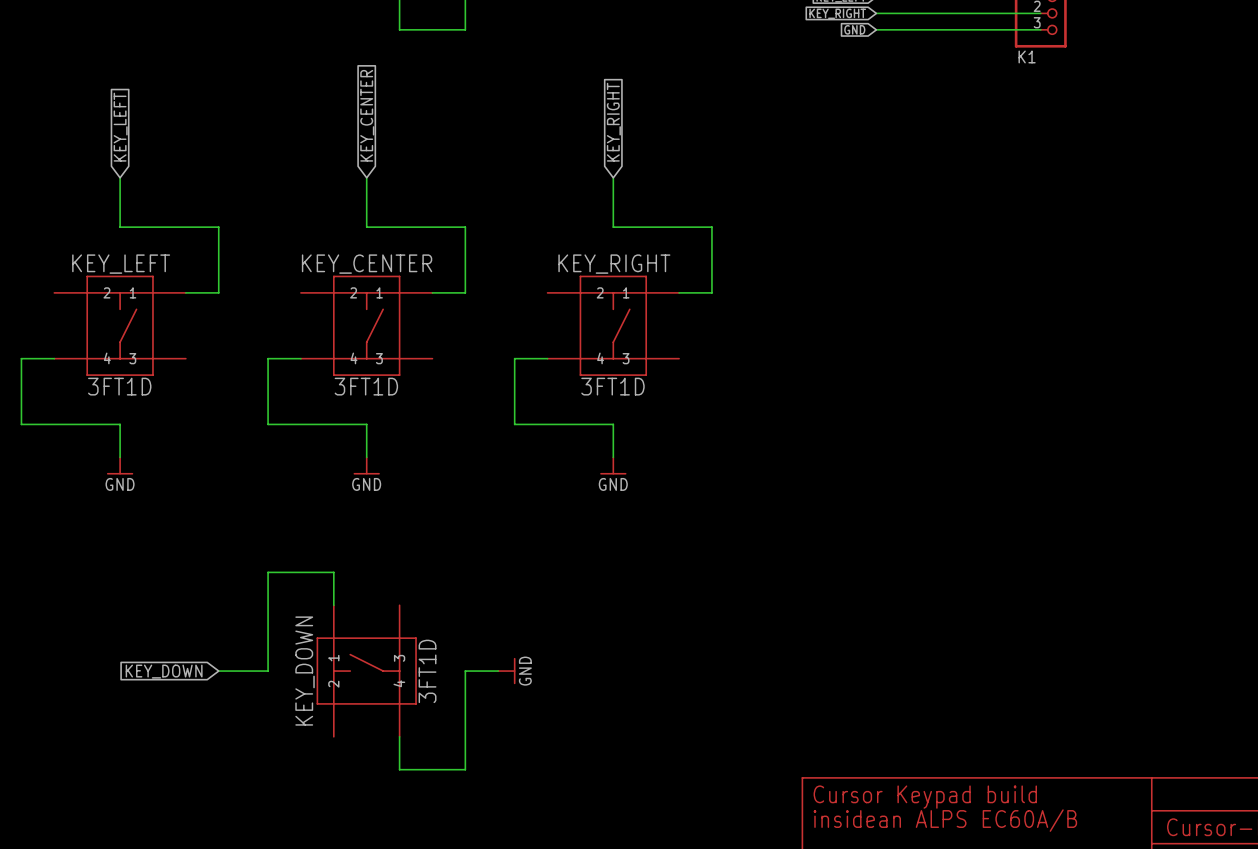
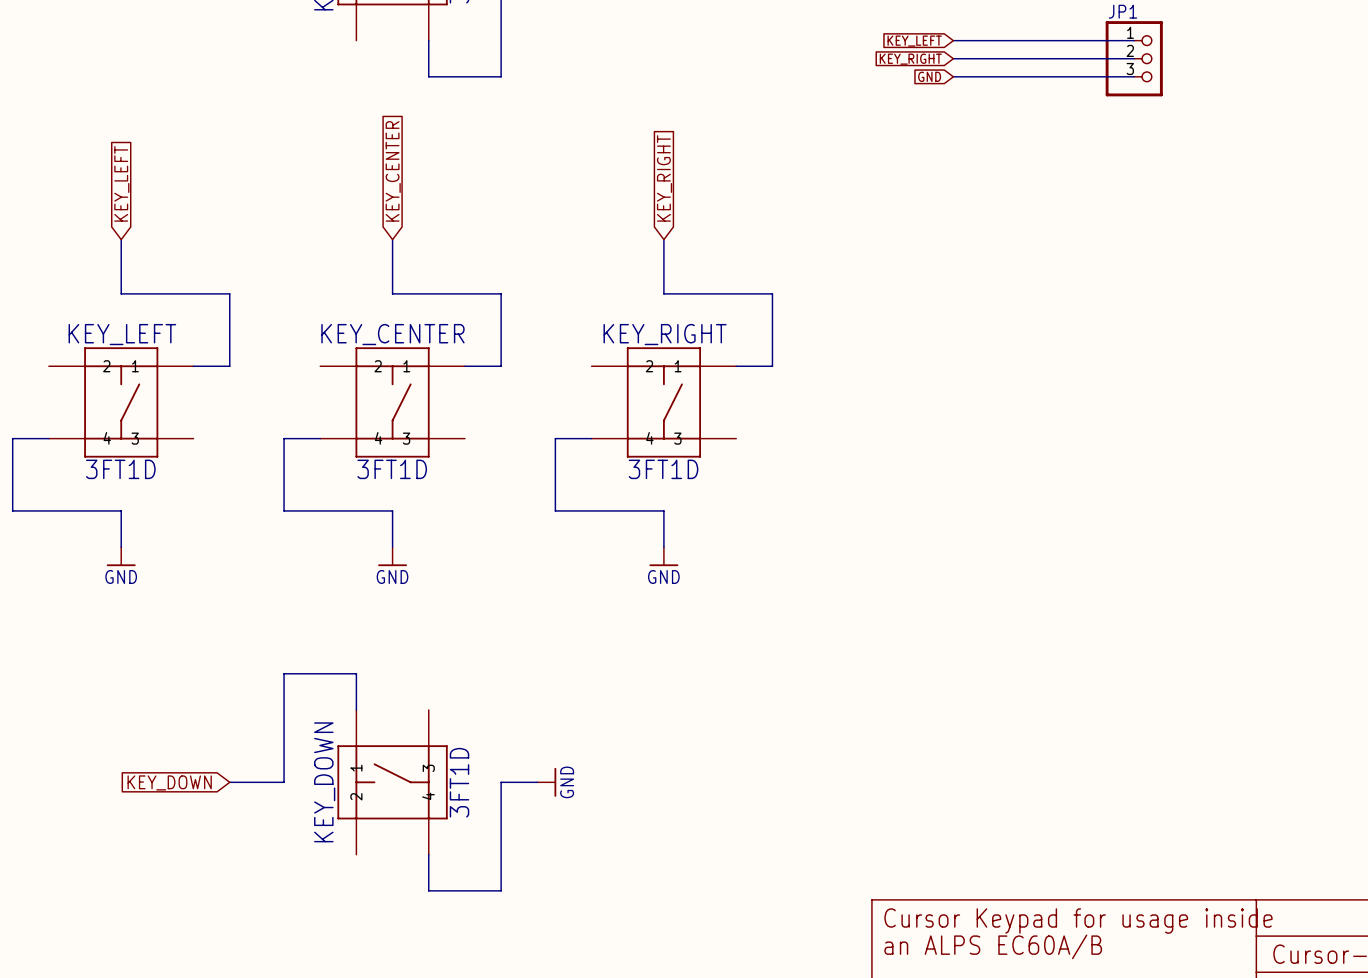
JP1 value: K1 (1027, 56) -> none
text: Cursor Keypad build (925, 797) -> Cursor Keypad for usage inside (1078, 921)
text: insidean ALPS EC60A/B (945, 820) -> an ALPS EC60A/B (993, 946)

